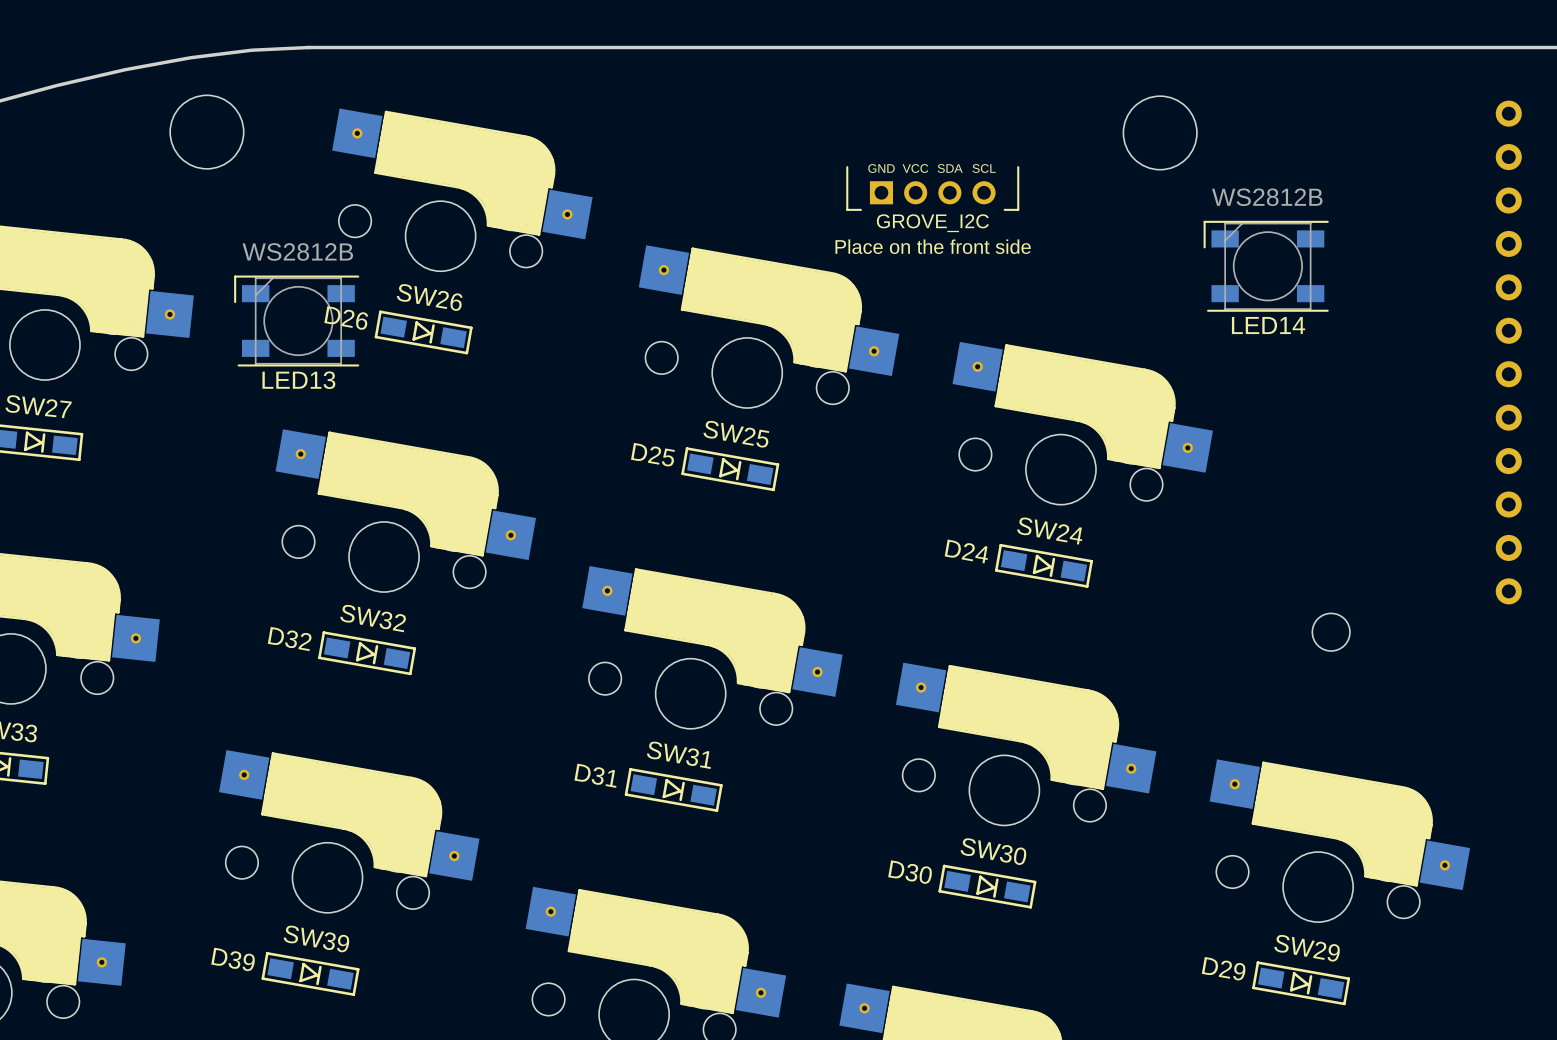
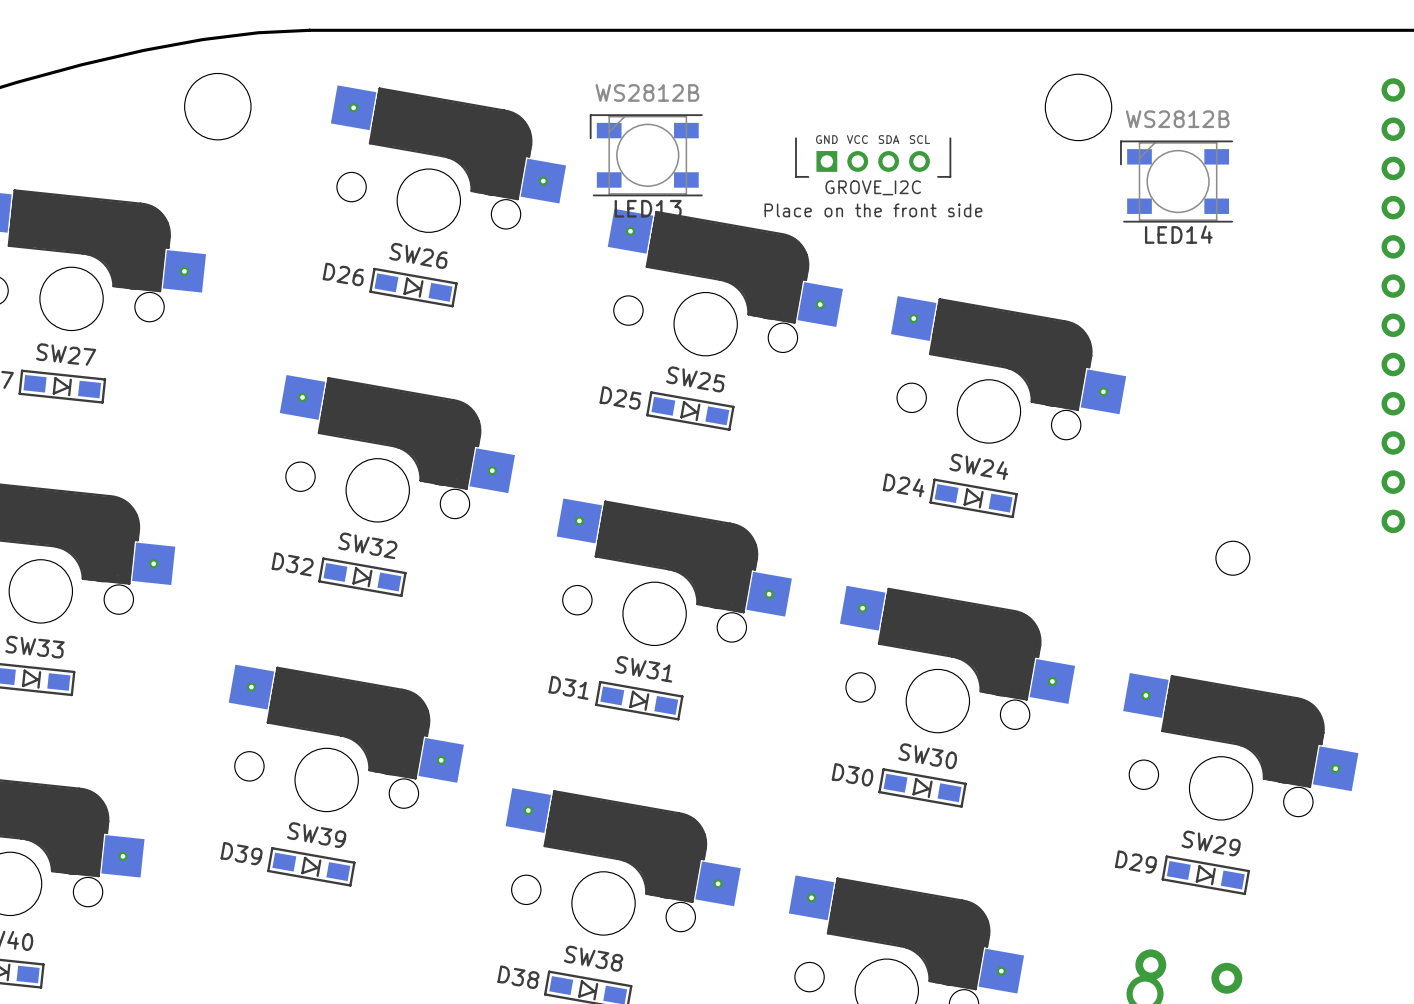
LED14 position: (1266, 266) -> (1176, 181)
LED13 position: (296, 321) -> (646, 155)

